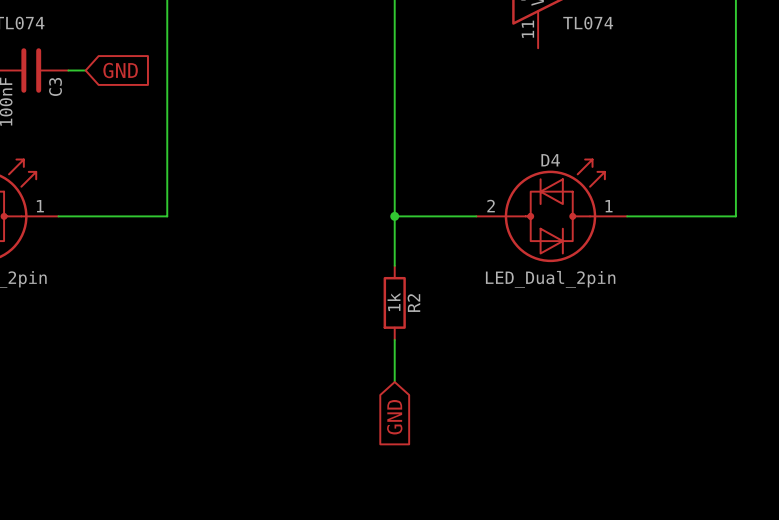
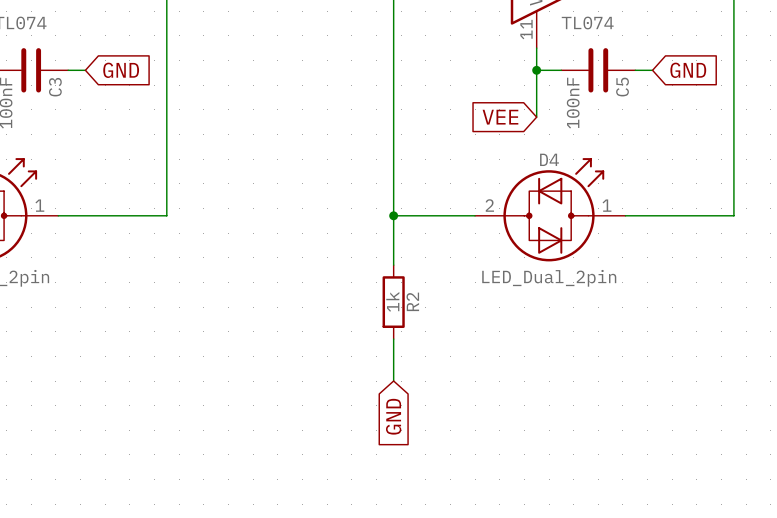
wire: none -> (536, 48) (536, 117)
wire: none -> (536, 70) (561, 70)
junction: none -> (536, 70)
C5: none -> 100nF (598, 70)
wire: none -> (635, 70) (652, 70)
global label: none -> GND (688, 70)
global label: none -> VEE (500, 117)

